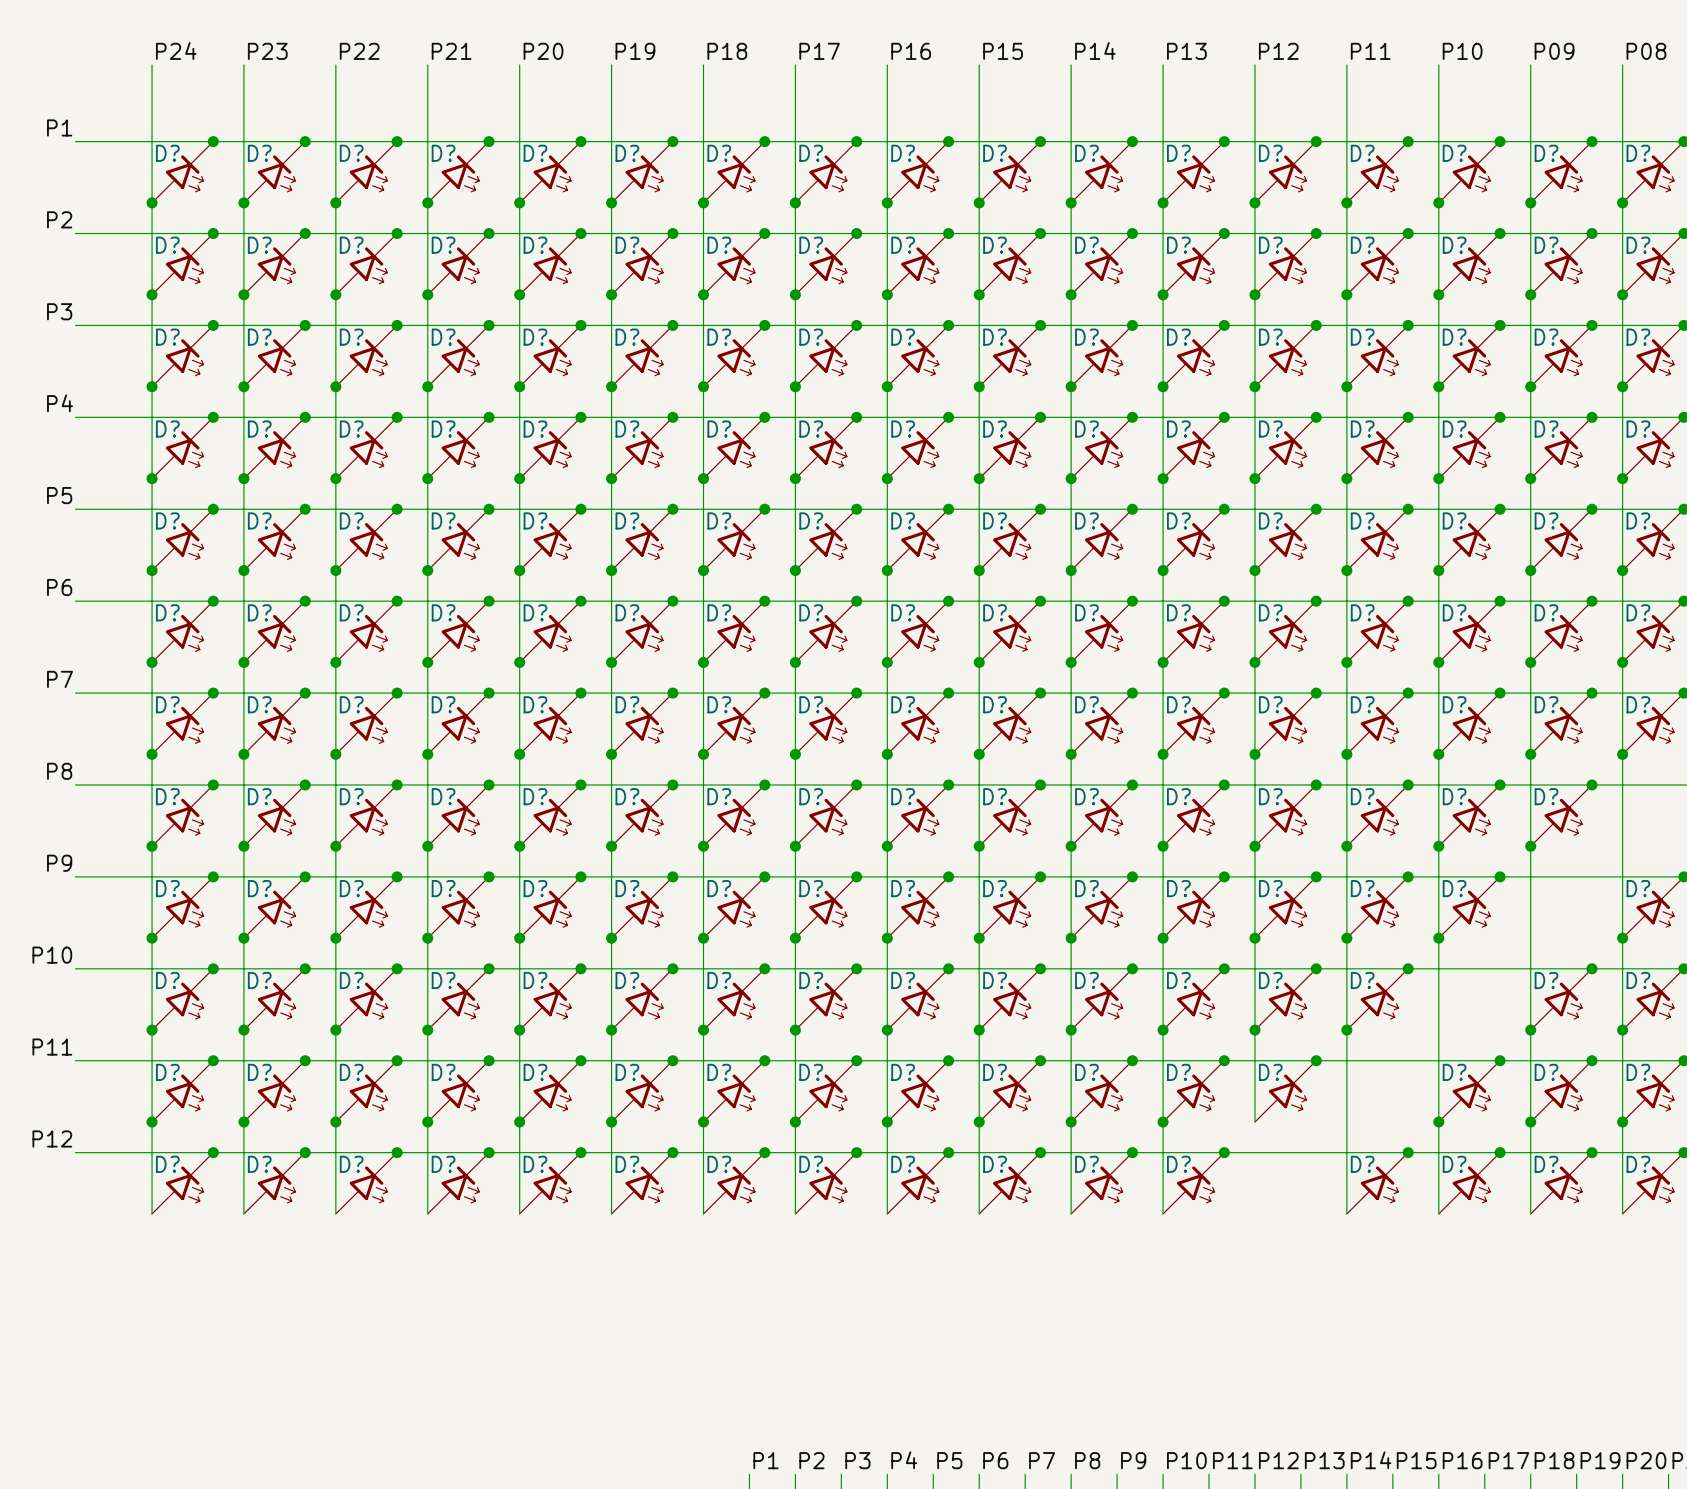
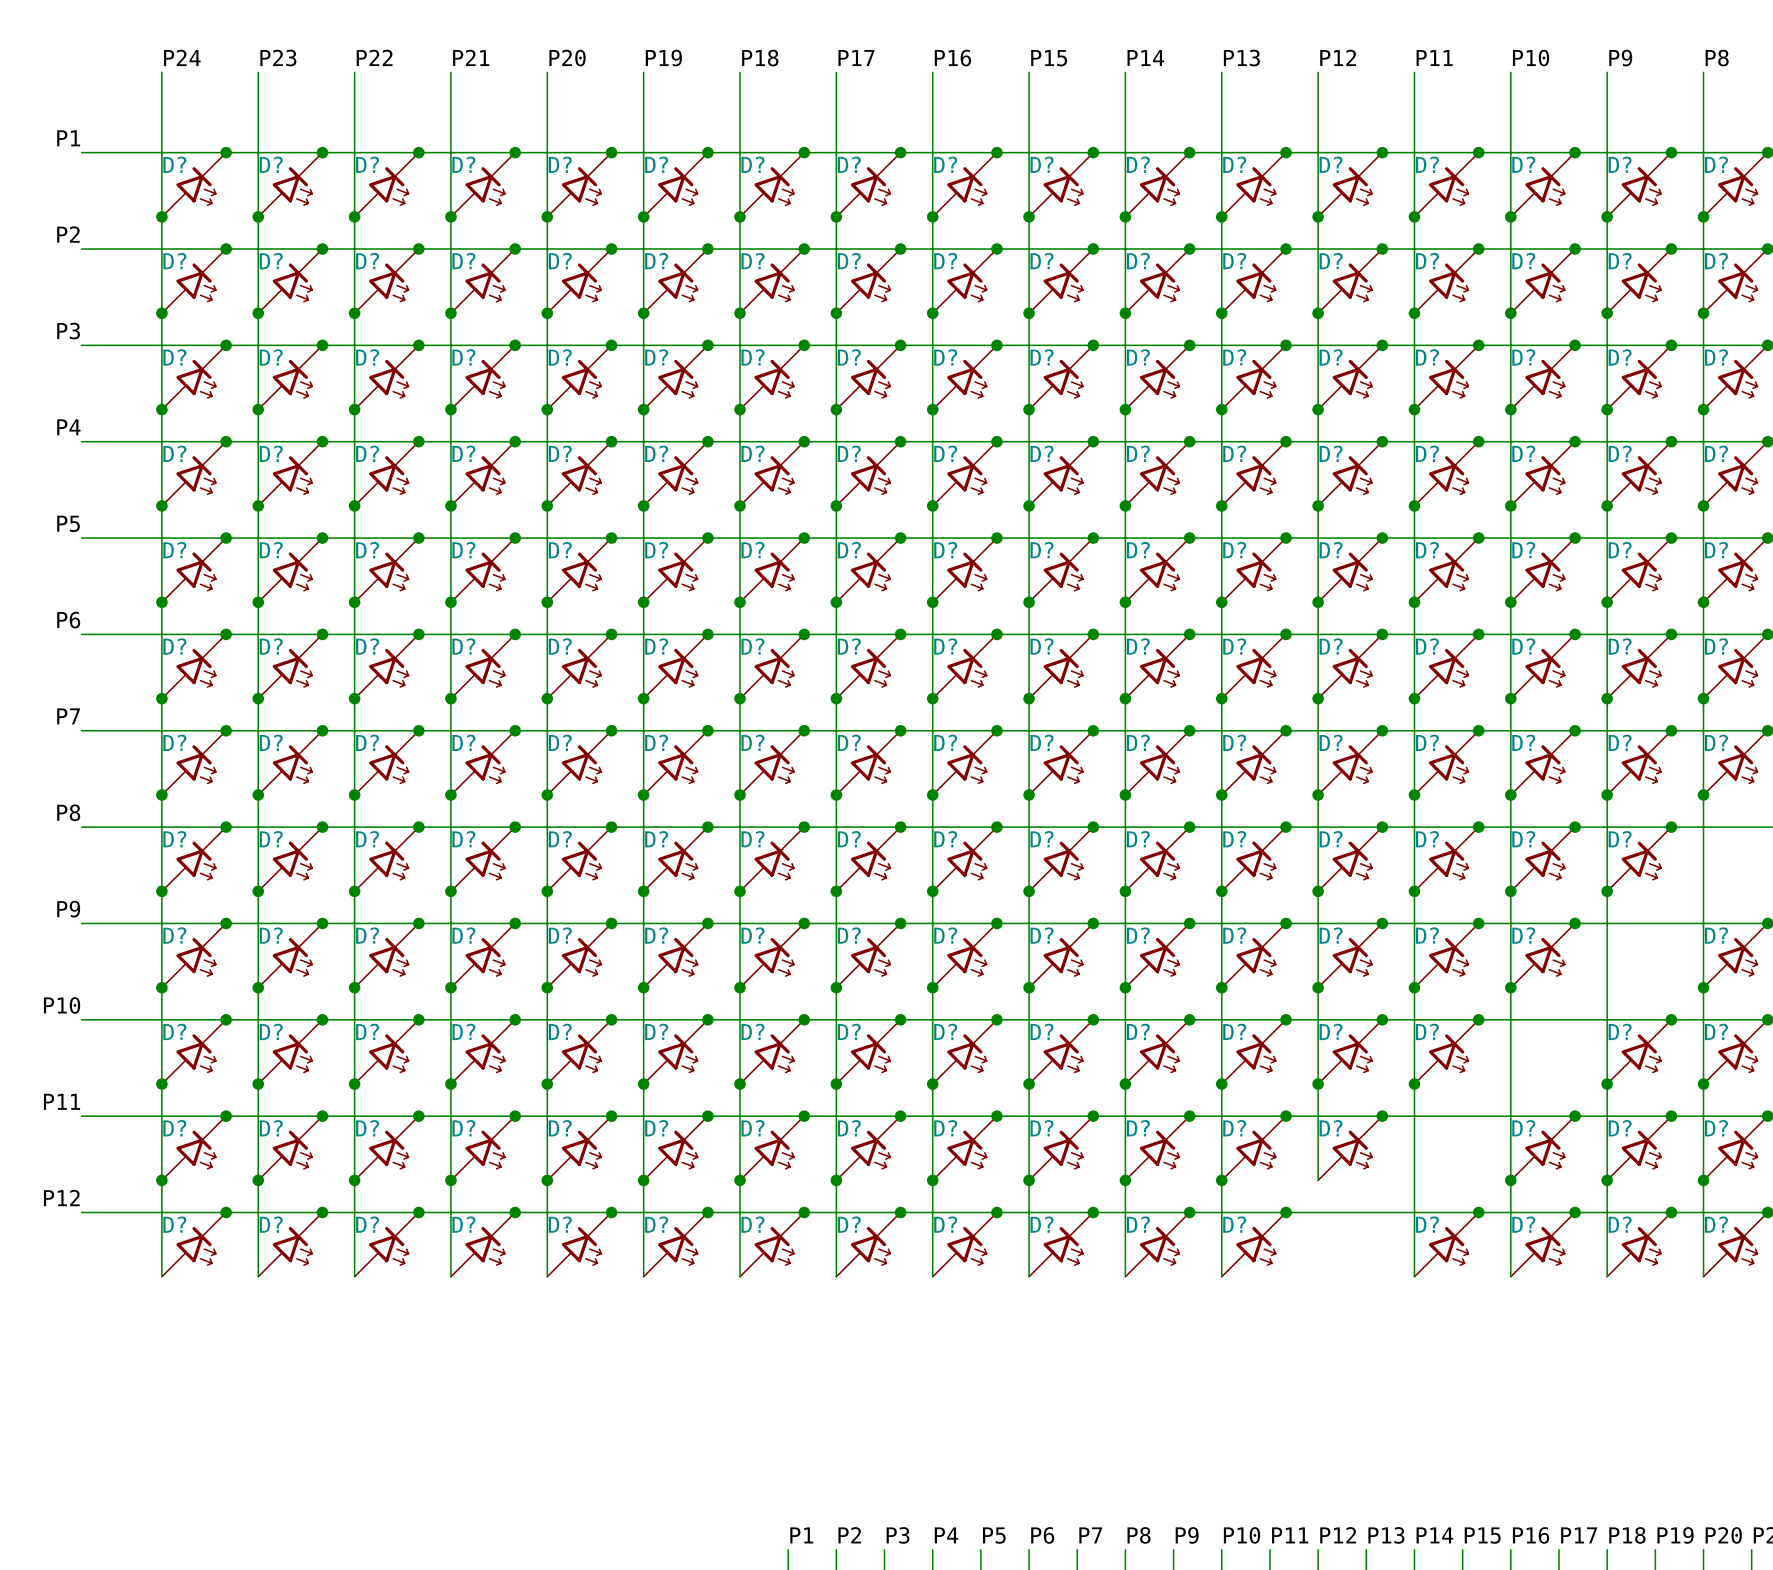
label: P09 (1554, 51) -> P9 (1620, 58)
label: P08 (1646, 51) -> P8 (1717, 58)

